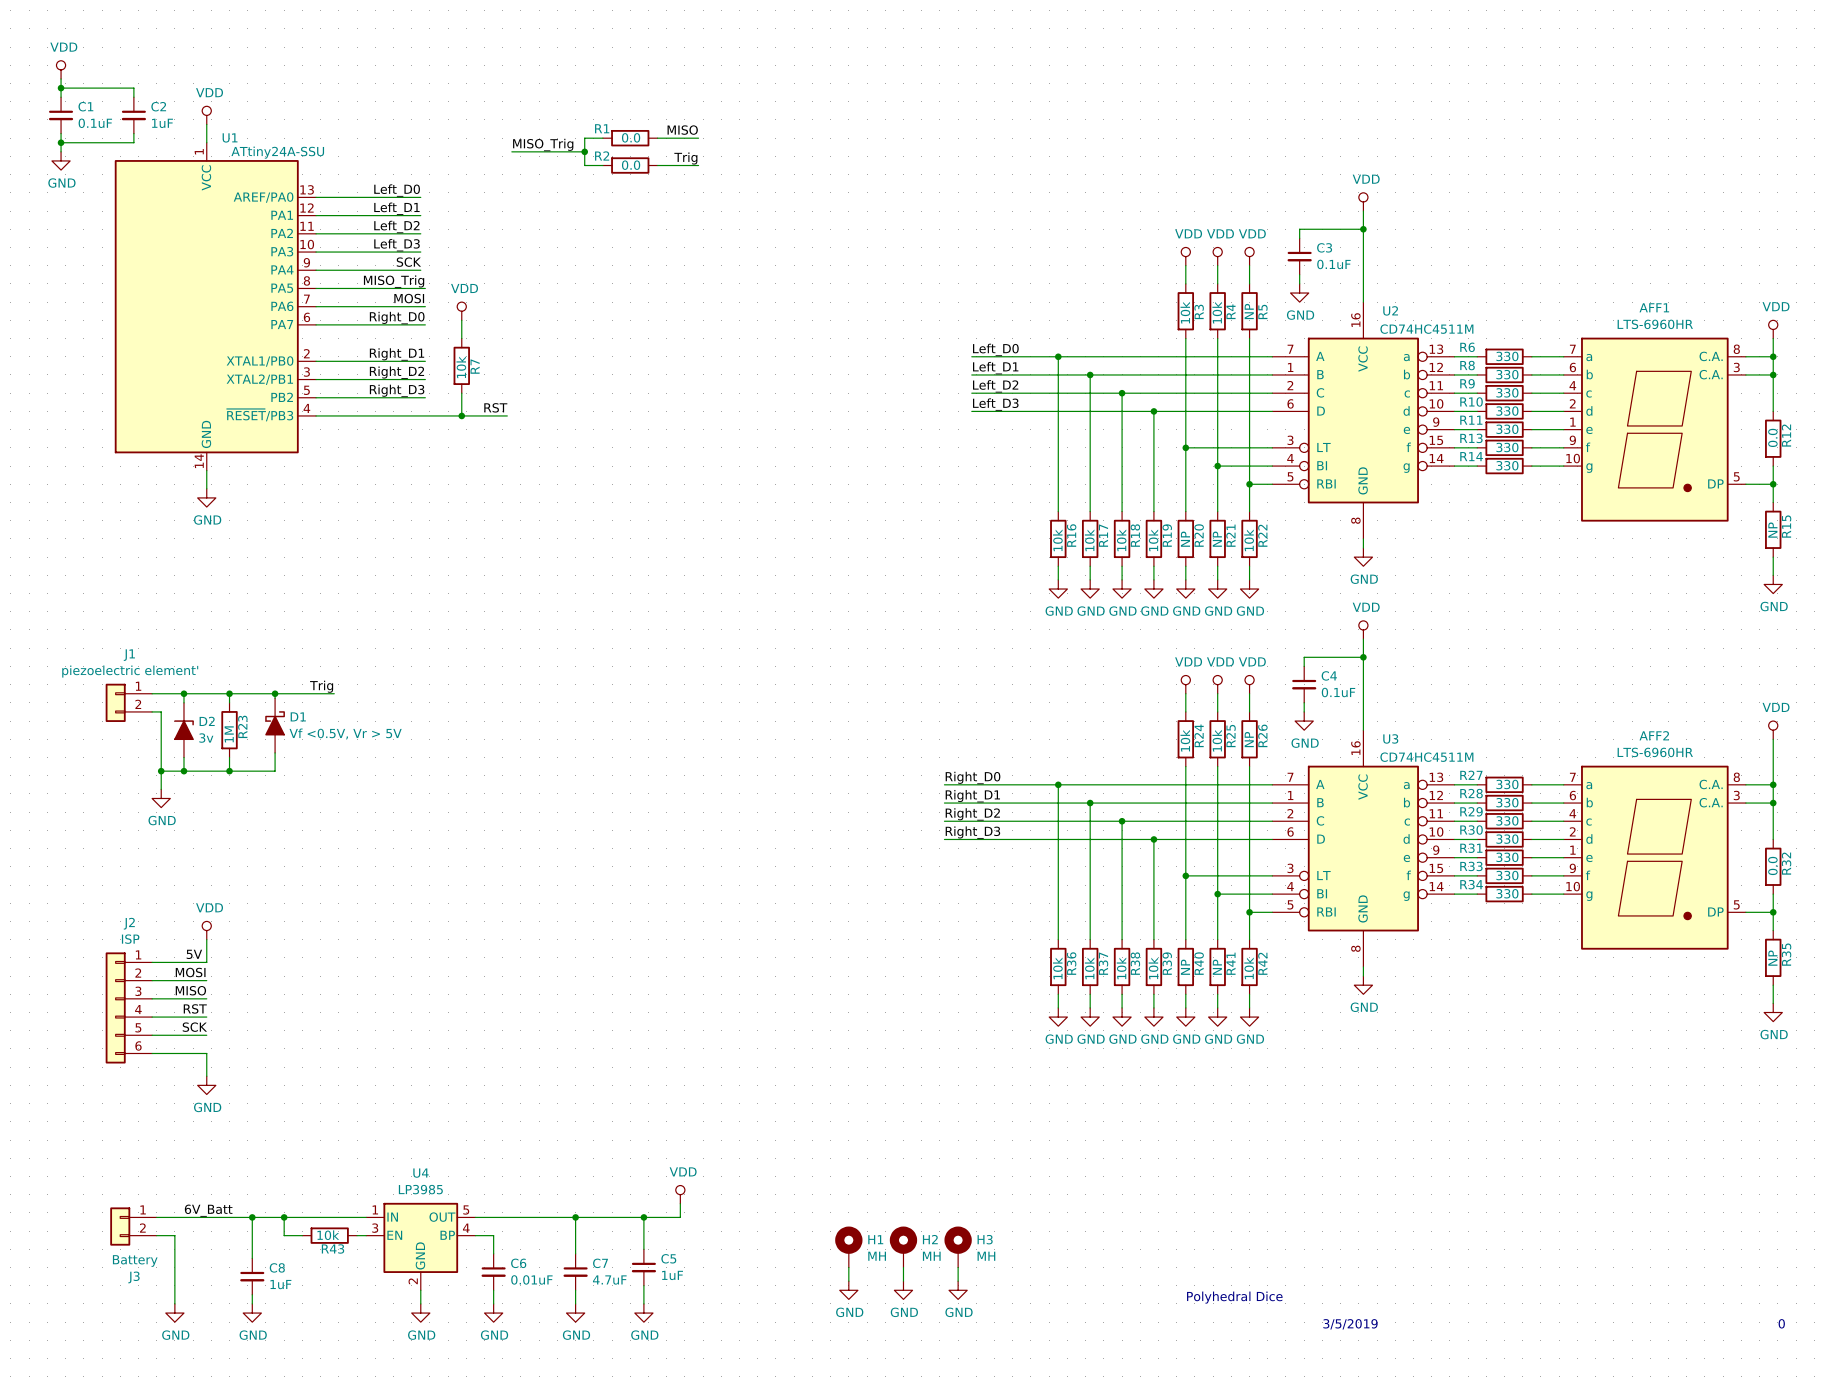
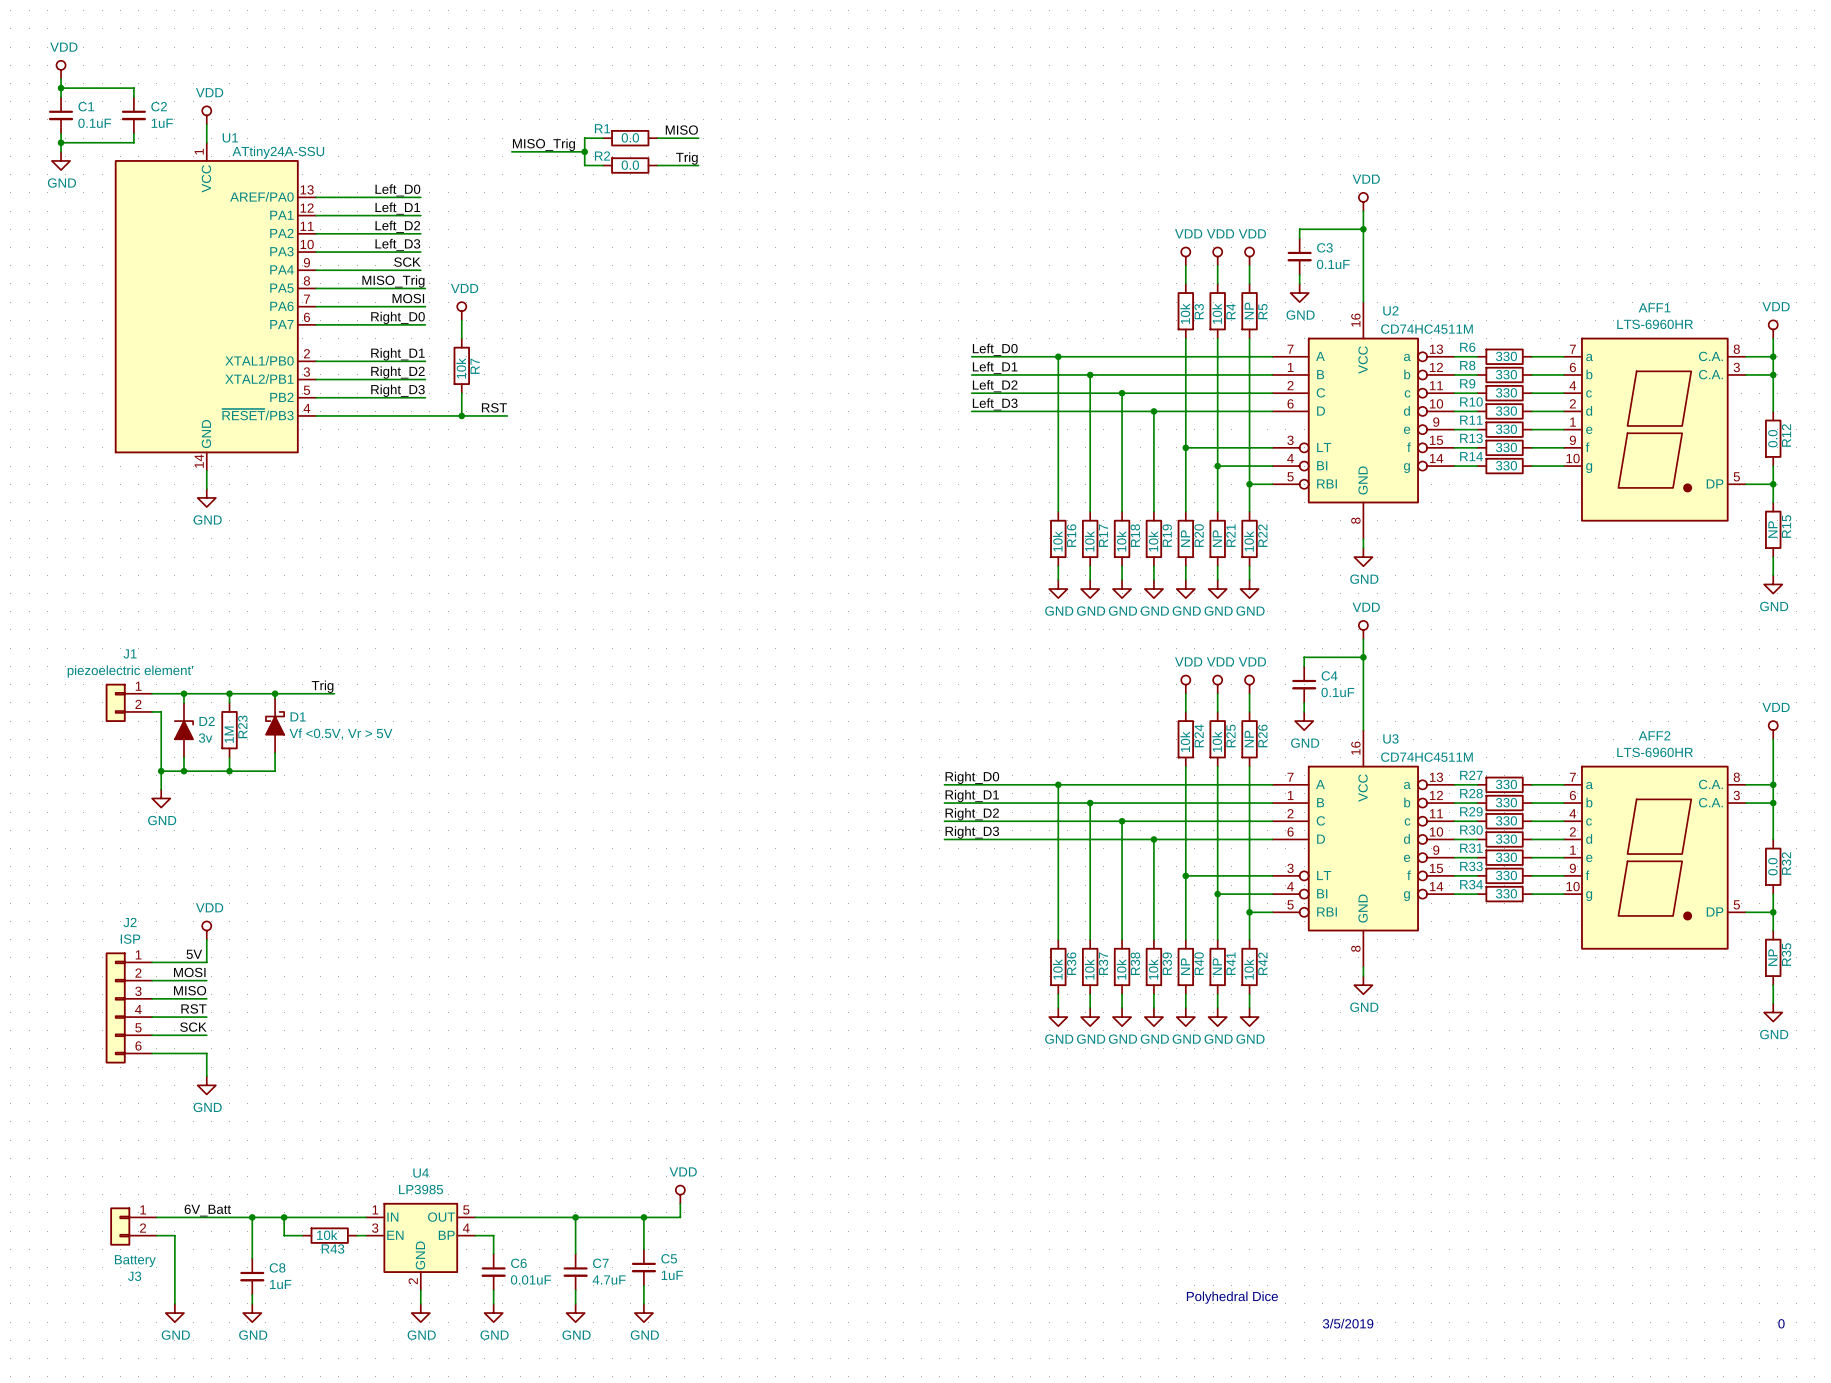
H1: MH (848, 1247) -> none
H2: MH (903, 1247) -> none
H3: MH (958, 1247) -> none
wire: (848, 1267) (848, 1281) -> none
wire: (903, 1267) (903, 1281) -> none
wire: (958, 1267) (958, 1281) -> none
power symbol: GND (848, 1290) -> none
power symbol: GND (903, 1290) -> none
power symbol: GND (958, 1290) -> none

